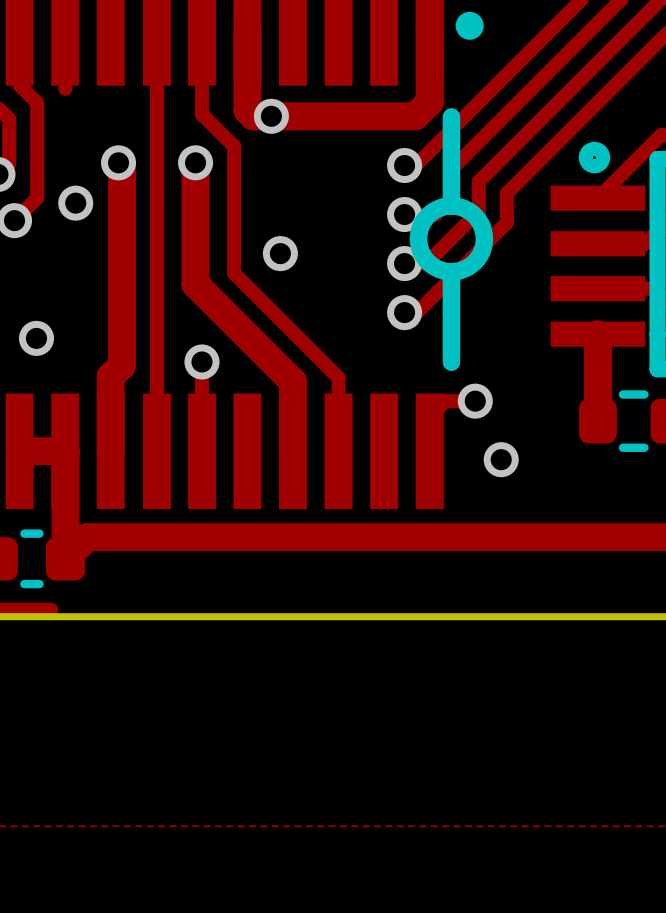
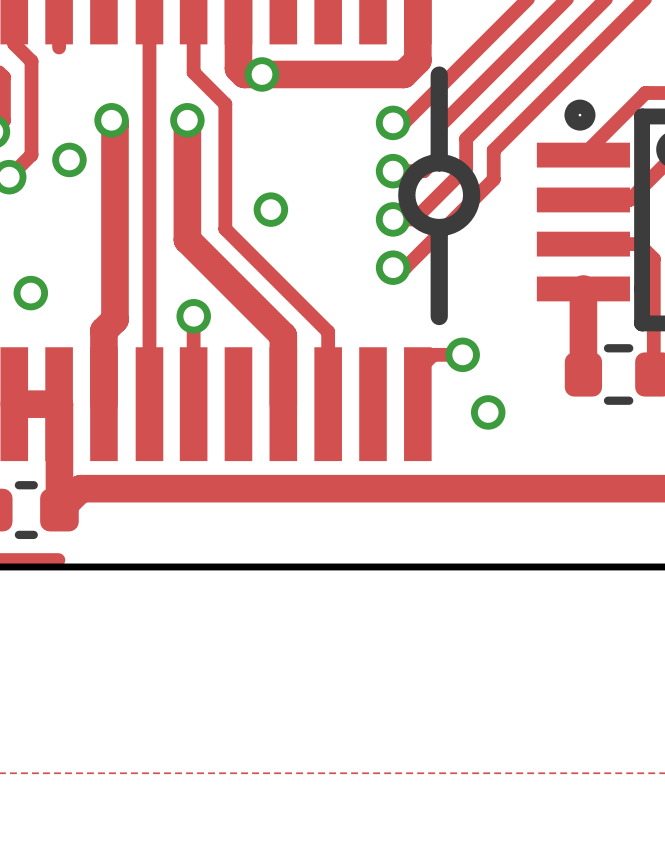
track: none -> (45, 560) (58, 560)

